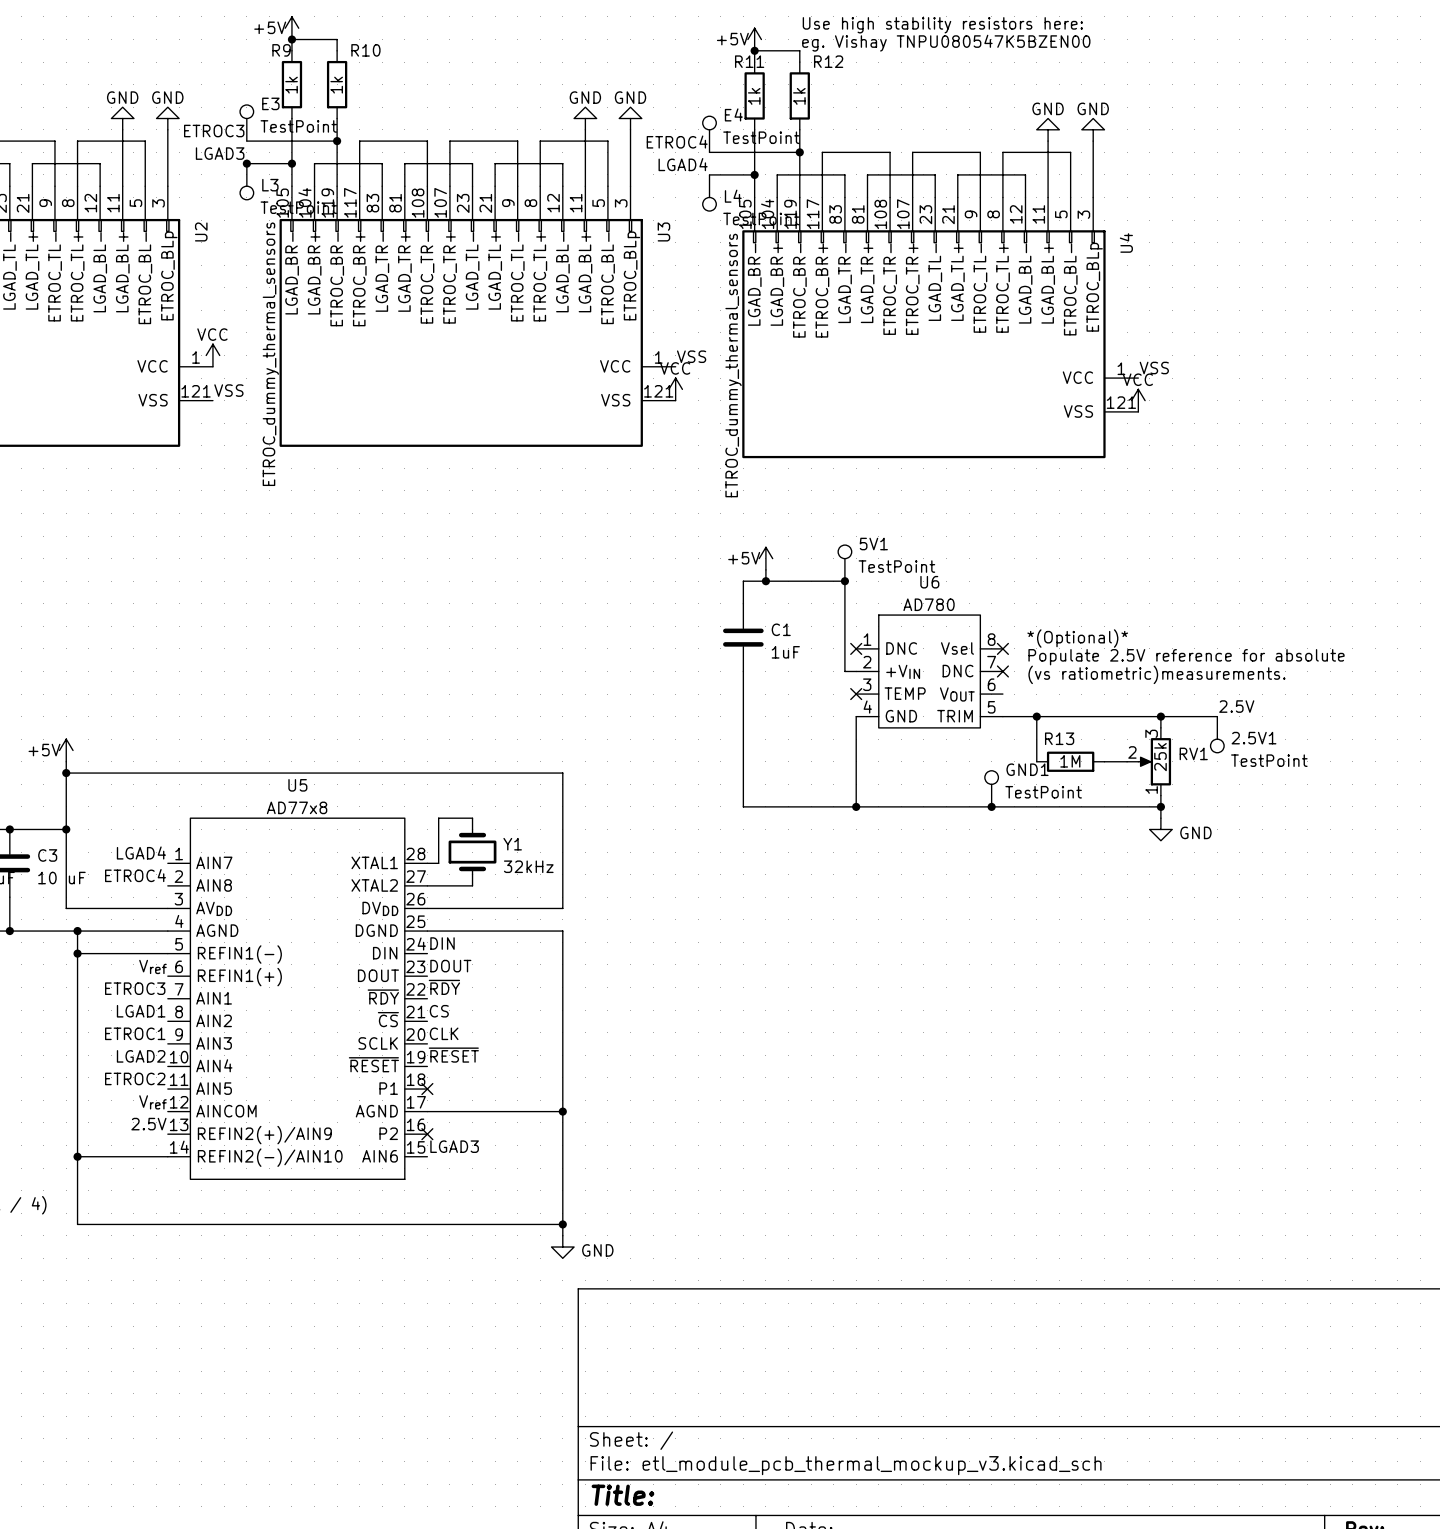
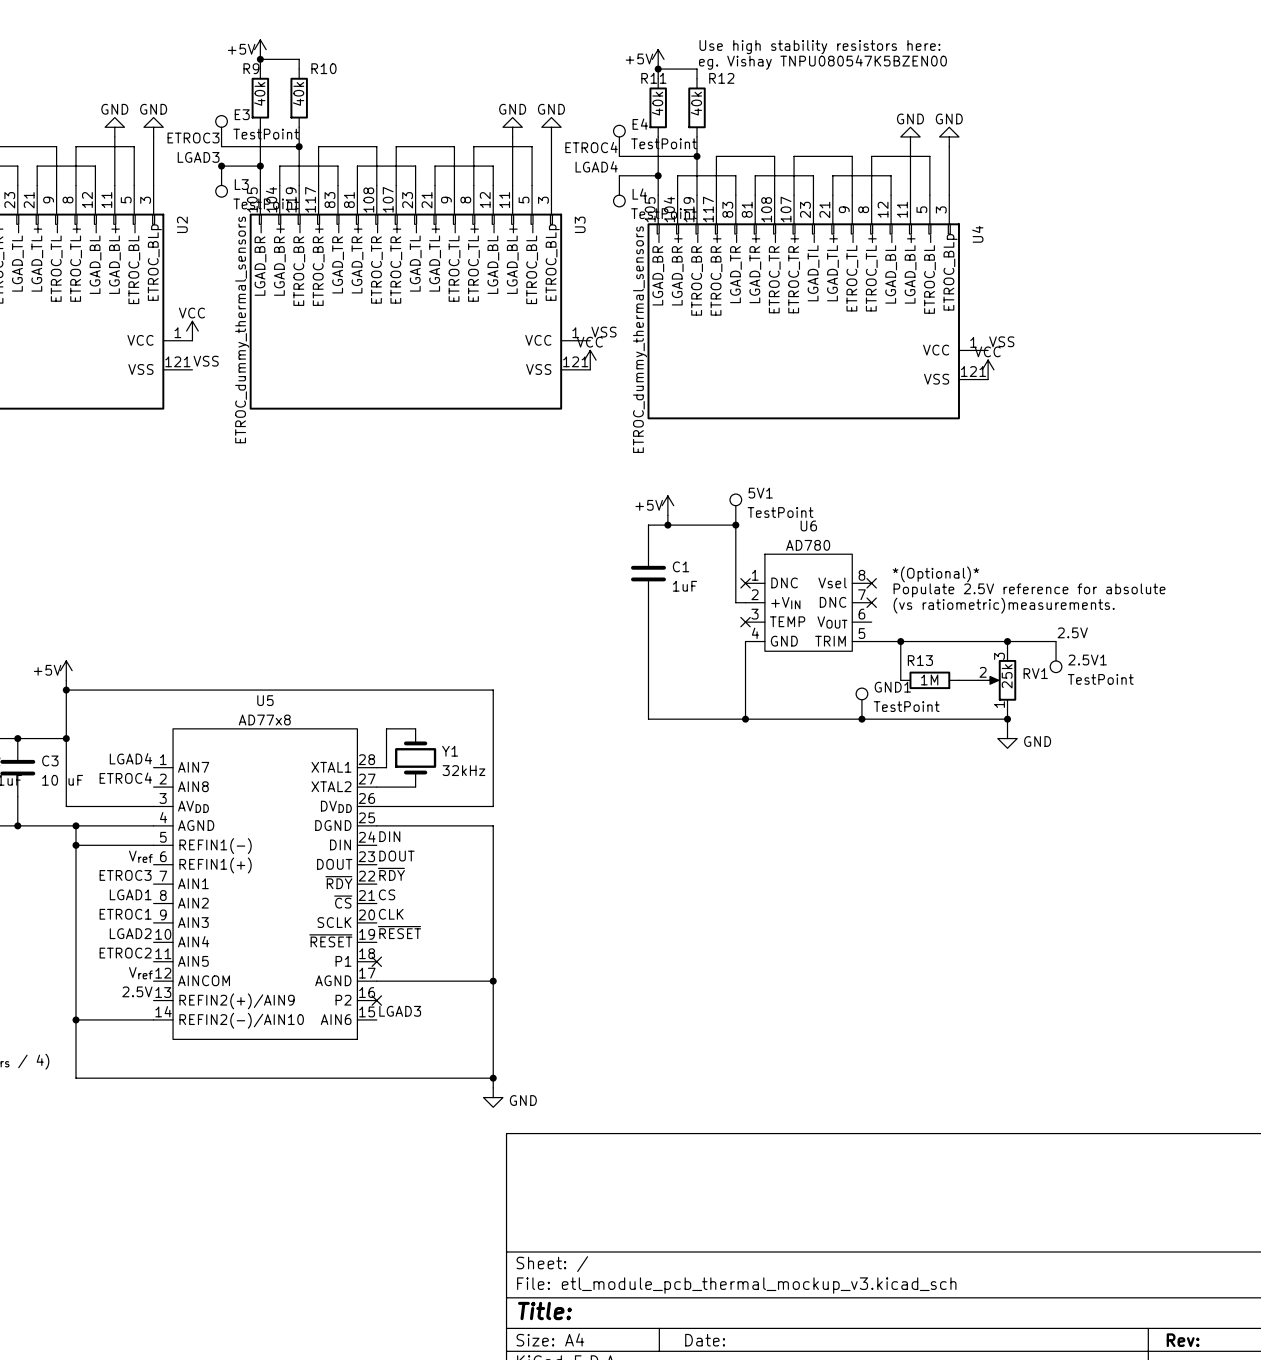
R9 value: 1k (291, 85) -> 40k (259, 93)
R10 value: 1k (336, 85) -> 40k (298, 93)
R11 value: 1k (754, 96) -> 40k (657, 103)
R12 value: 1k (799, 96) -> 40k (696, 103)

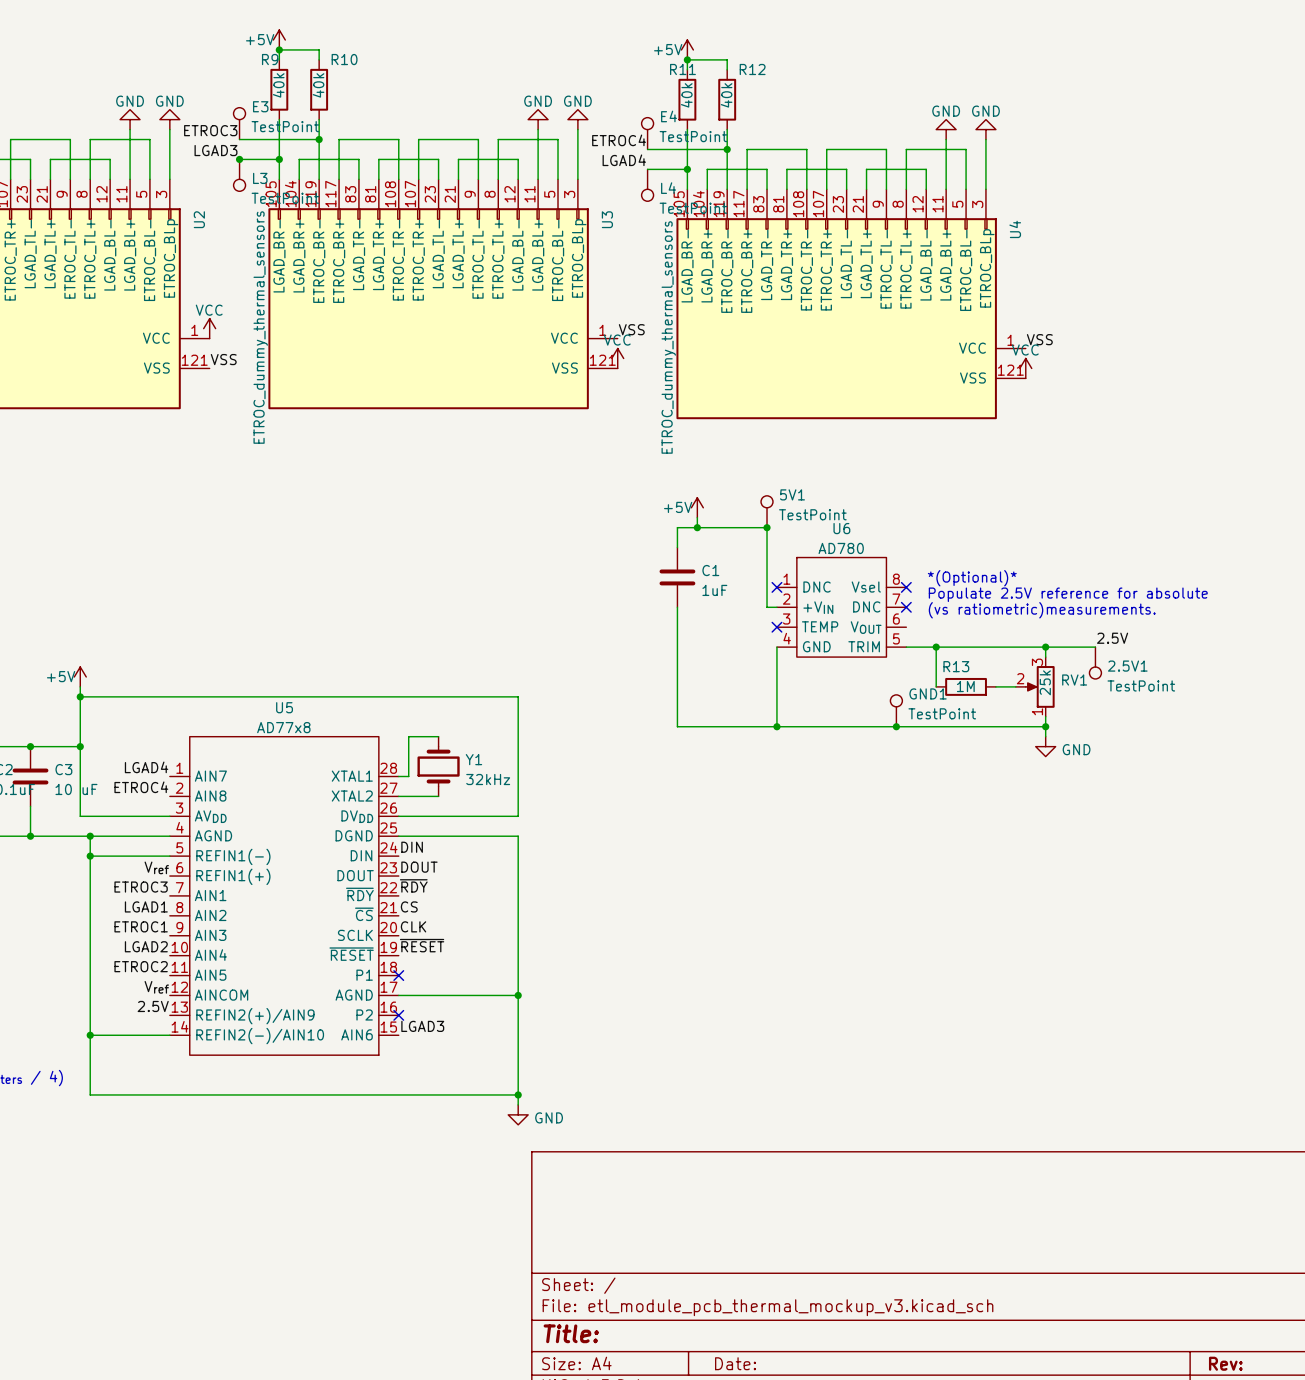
text: Use high stability resistors here: (819, 47) -> none
text: eg. Vishay TNPU080547K5BZEN00 (822, 62) -> none

